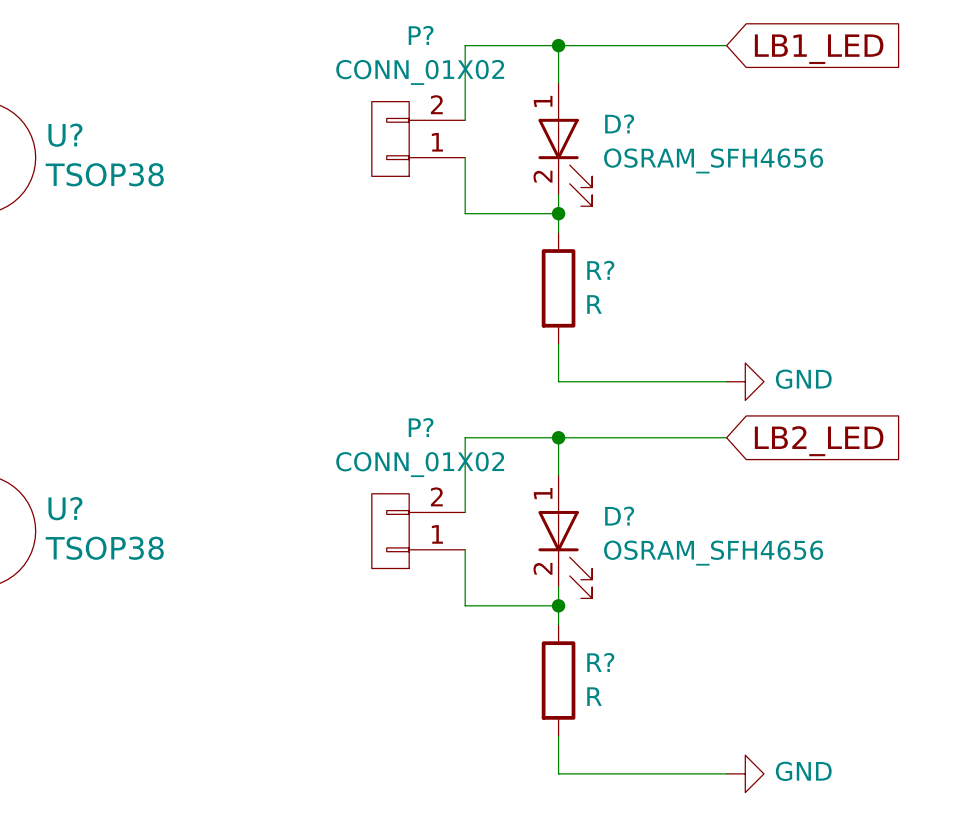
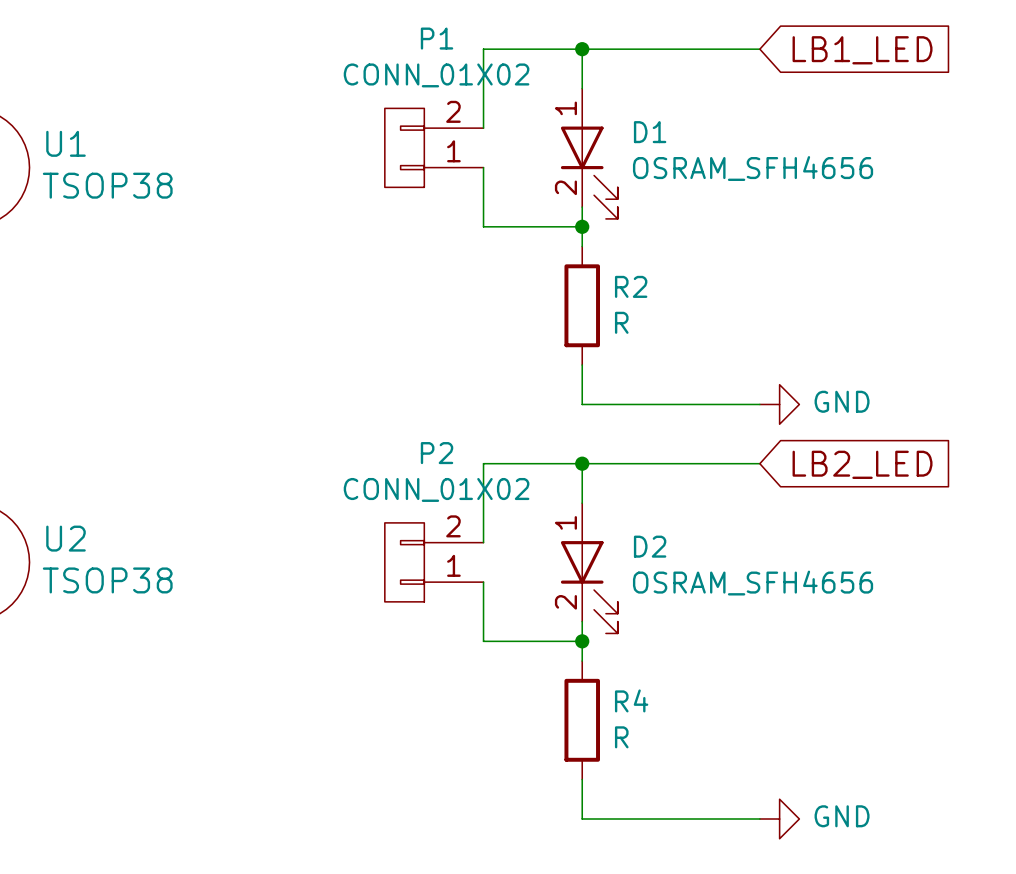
P? name: P? (421, 35) -> P1 (437, 38)
D? name: D? (619, 123) -> D1 (650, 132)
U? name: U? (65, 135) -> U1 (66, 143)
R? name: R? (600, 270) -> R2 (631, 286)
P? name: P? (421, 427) -> P2 (437, 453)
U? name: U? (65, 508) -> U2 (66, 538)
D? name: D? (619, 516) -> D2 (650, 546)
R? name: R? (600, 662) -> R4 (631, 700)

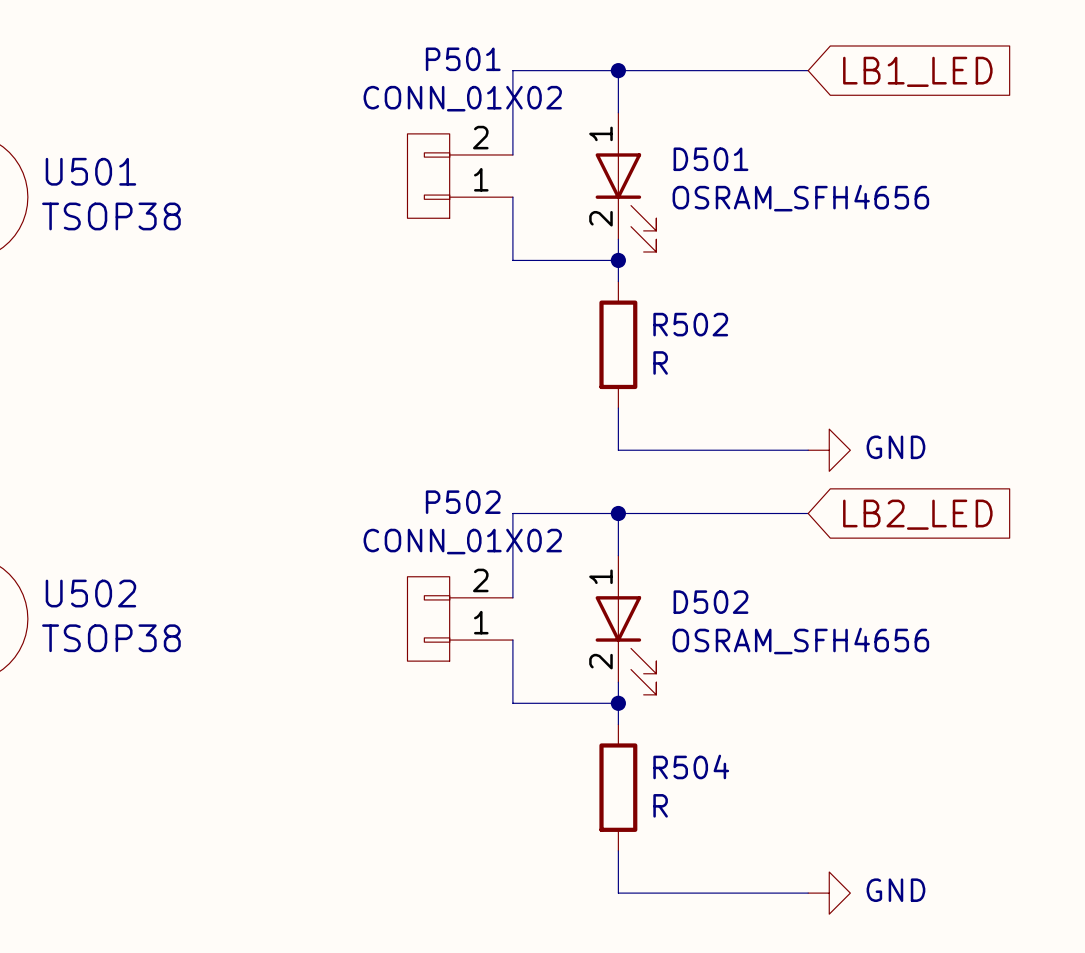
P1 name: P1 (437, 38) -> P501 (463, 59)
D1 name: D1 (650, 132) -> D501 (710, 159)
U1 name: U1 (66, 143) -> U501 (90, 171)
R2 name: R2 (631, 286) -> R502 (690, 324)
P2 name: P2 (437, 453) -> P502 (463, 502)
U2 name: U2 (66, 538) -> U502 (90, 593)
D2 name: D2 (650, 546) -> D502 (710, 602)
R4 name: R4 (631, 700) -> R504 (691, 766)

